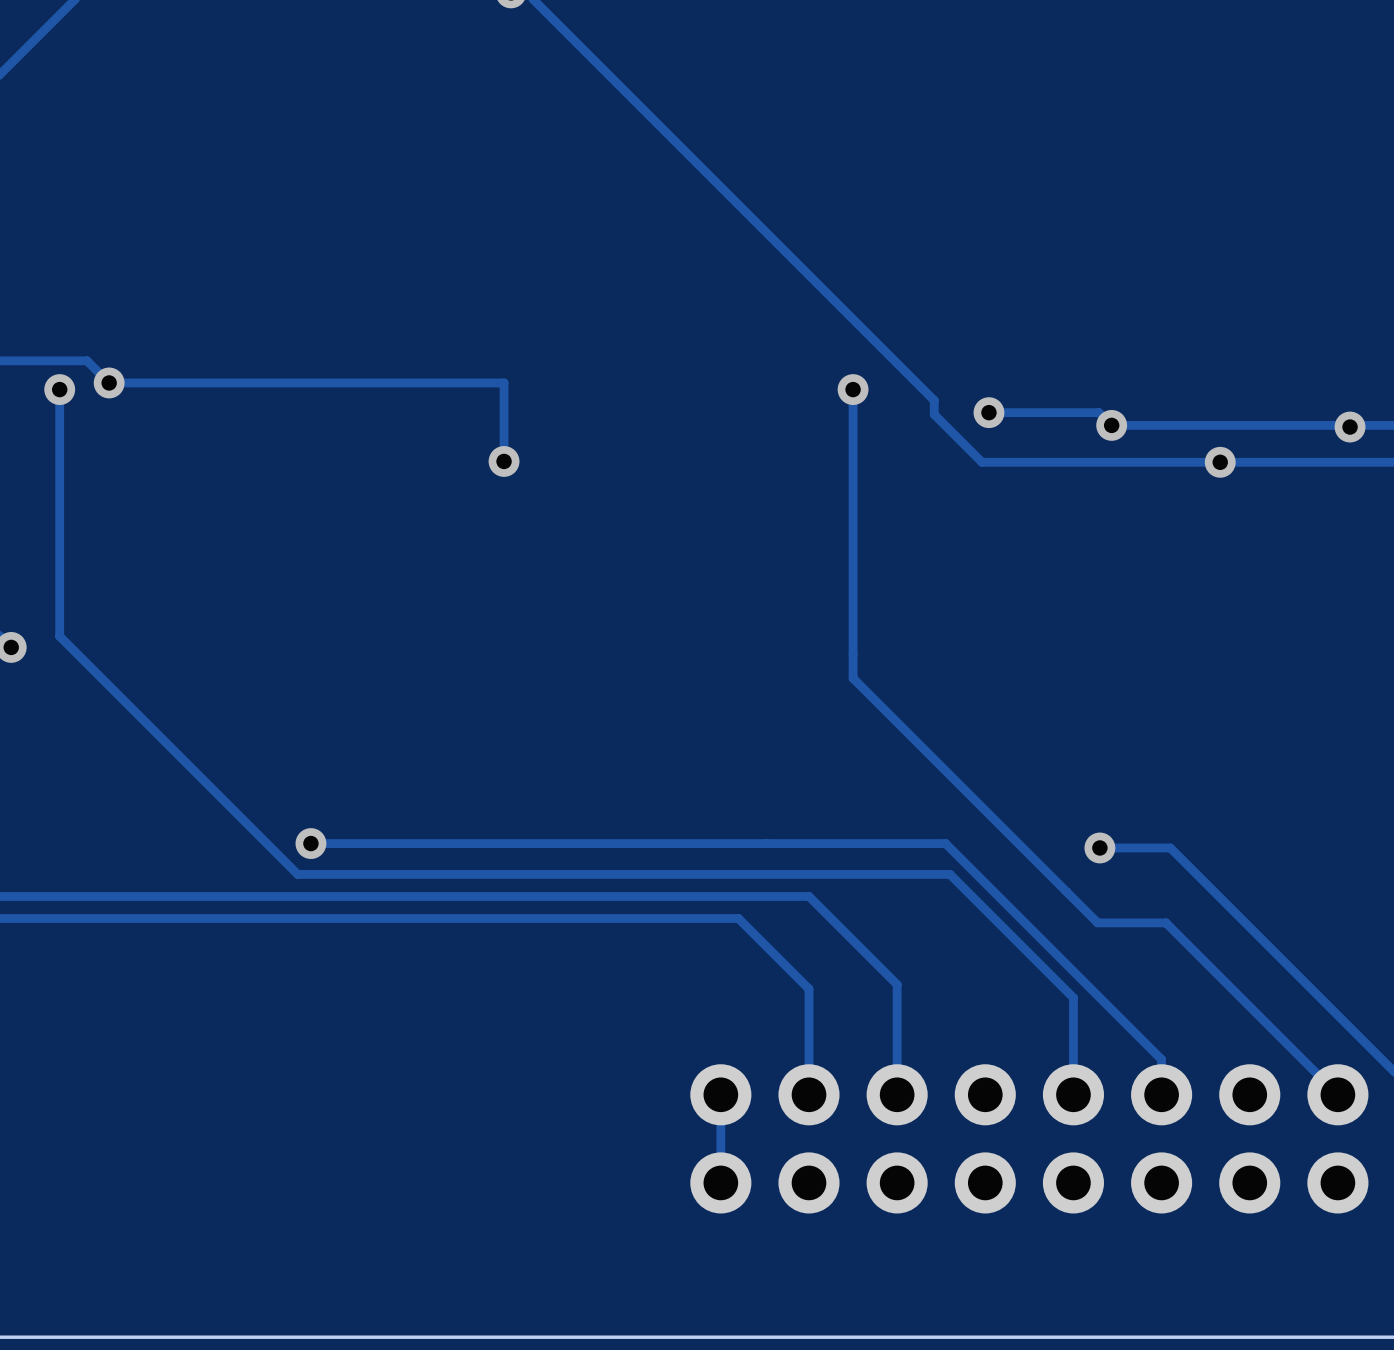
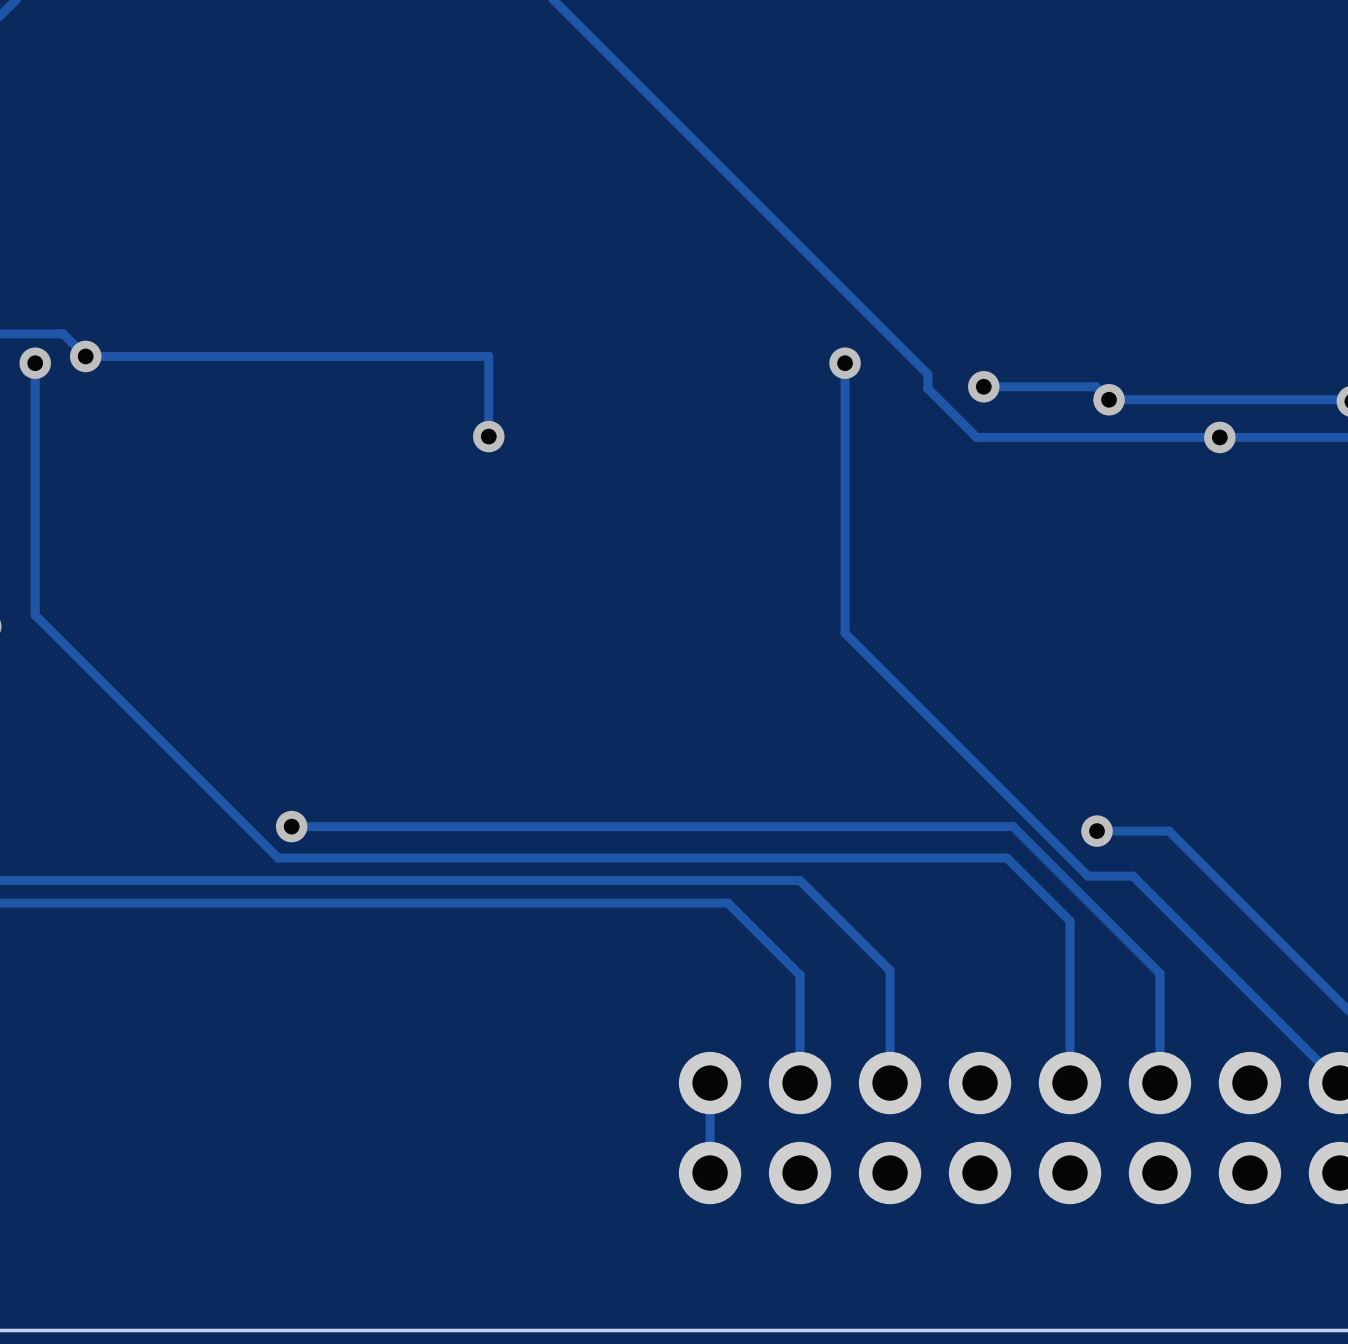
track: (853, 654) (853, 678) (1097, 922) (1166, 922) -> (845, 633) (1088, 876) (1132, 876) (1164, 907)
track: (945, 843) (1161, 1059) -> (939, 826) (1013, 826) (1159, 973) (1159, 1047)
track: (950, 874) (1073, 997) -> (944, 858) (1007, 858) (1070, 921) (1070, 984)

